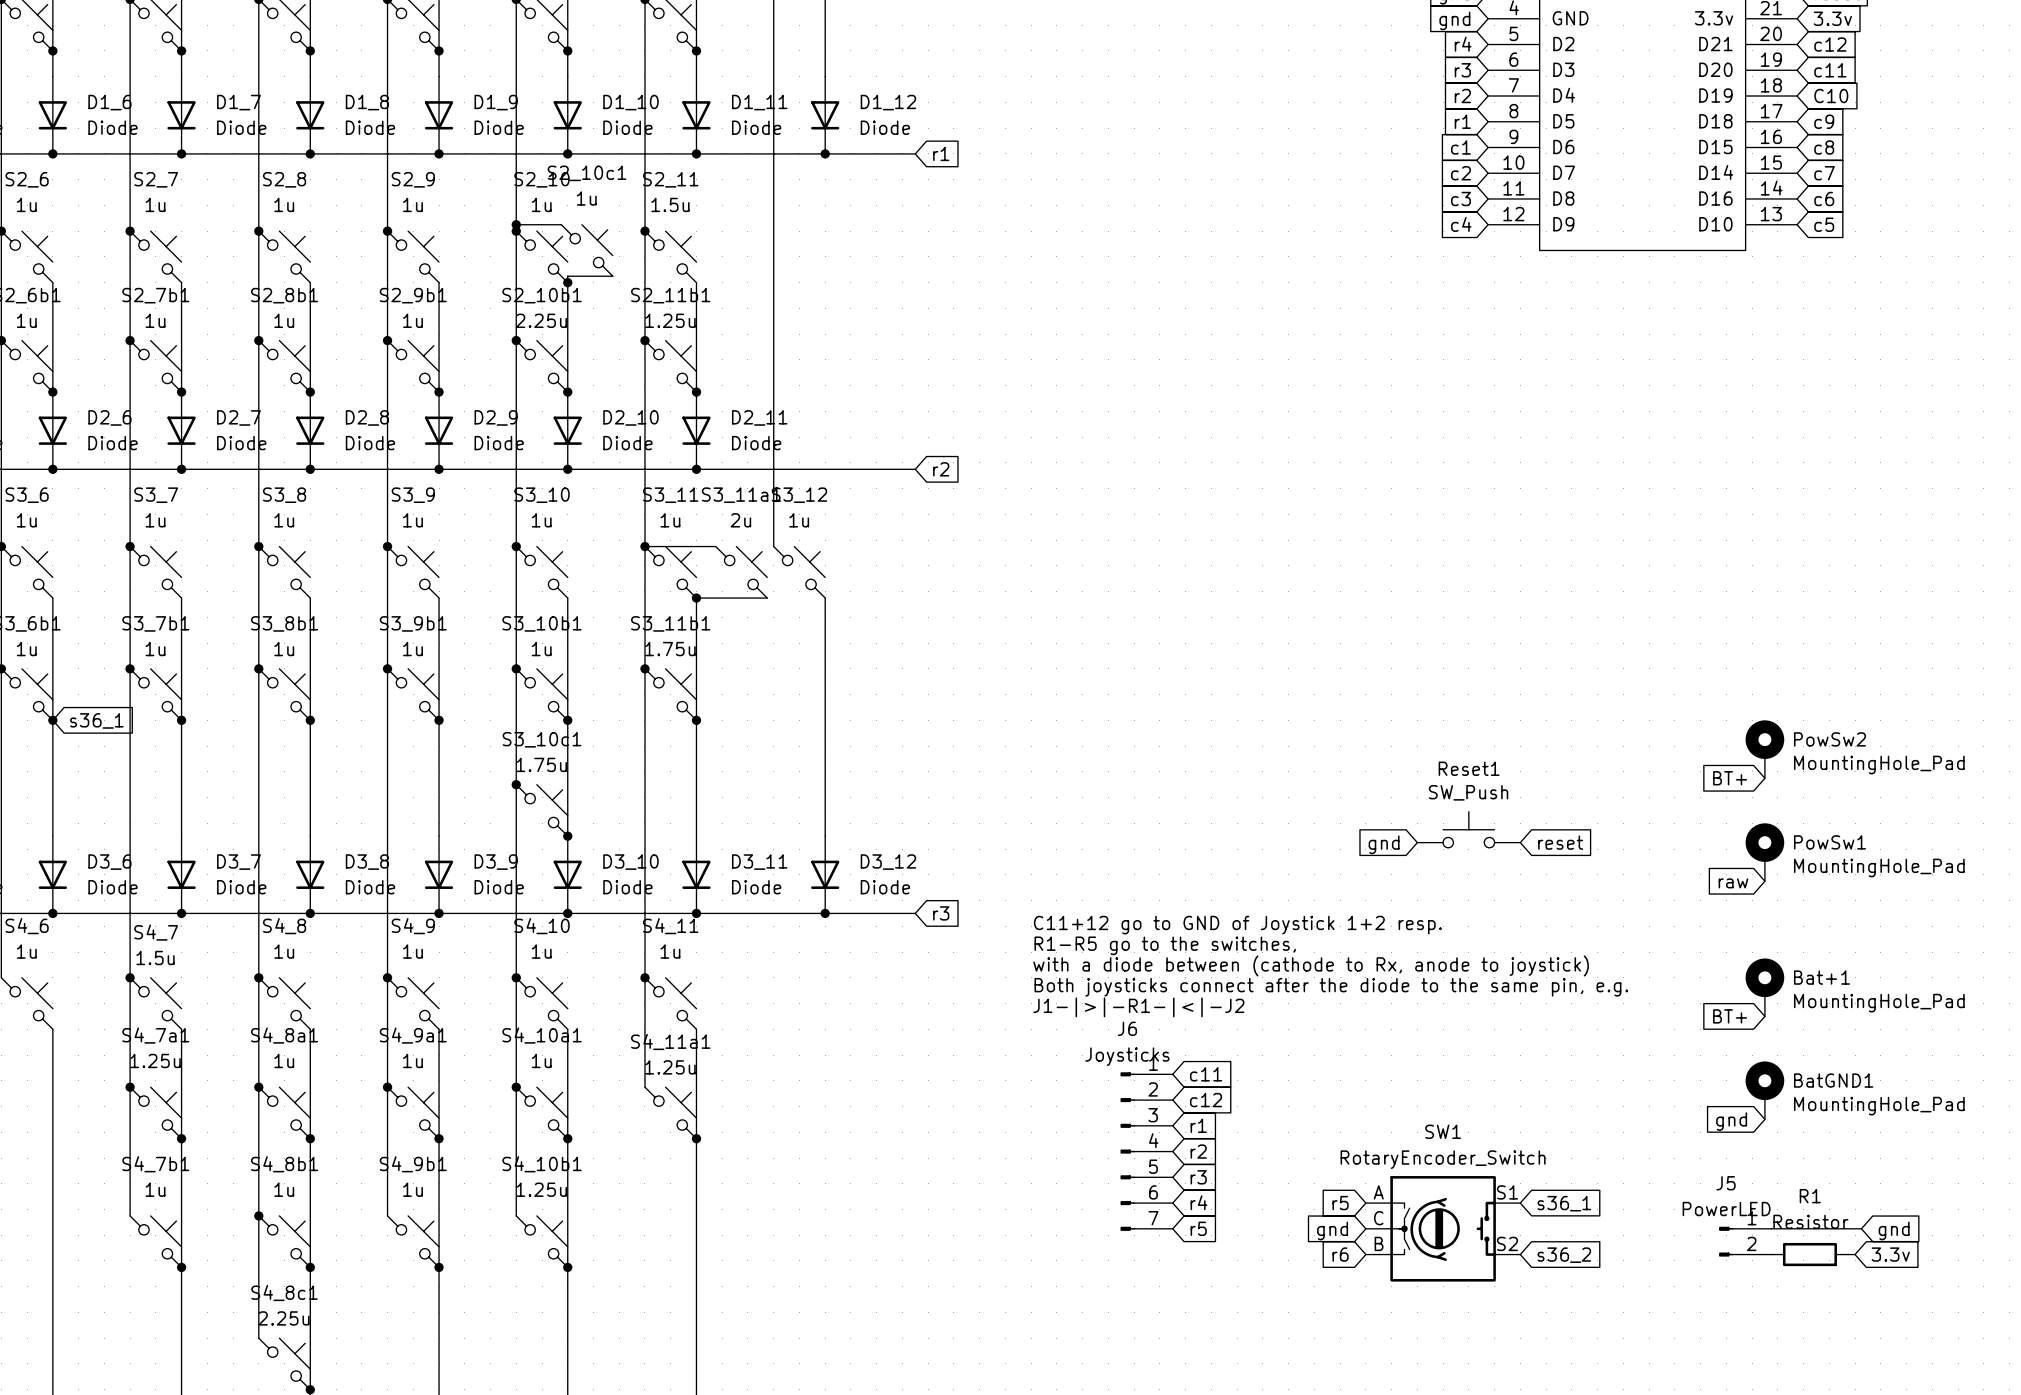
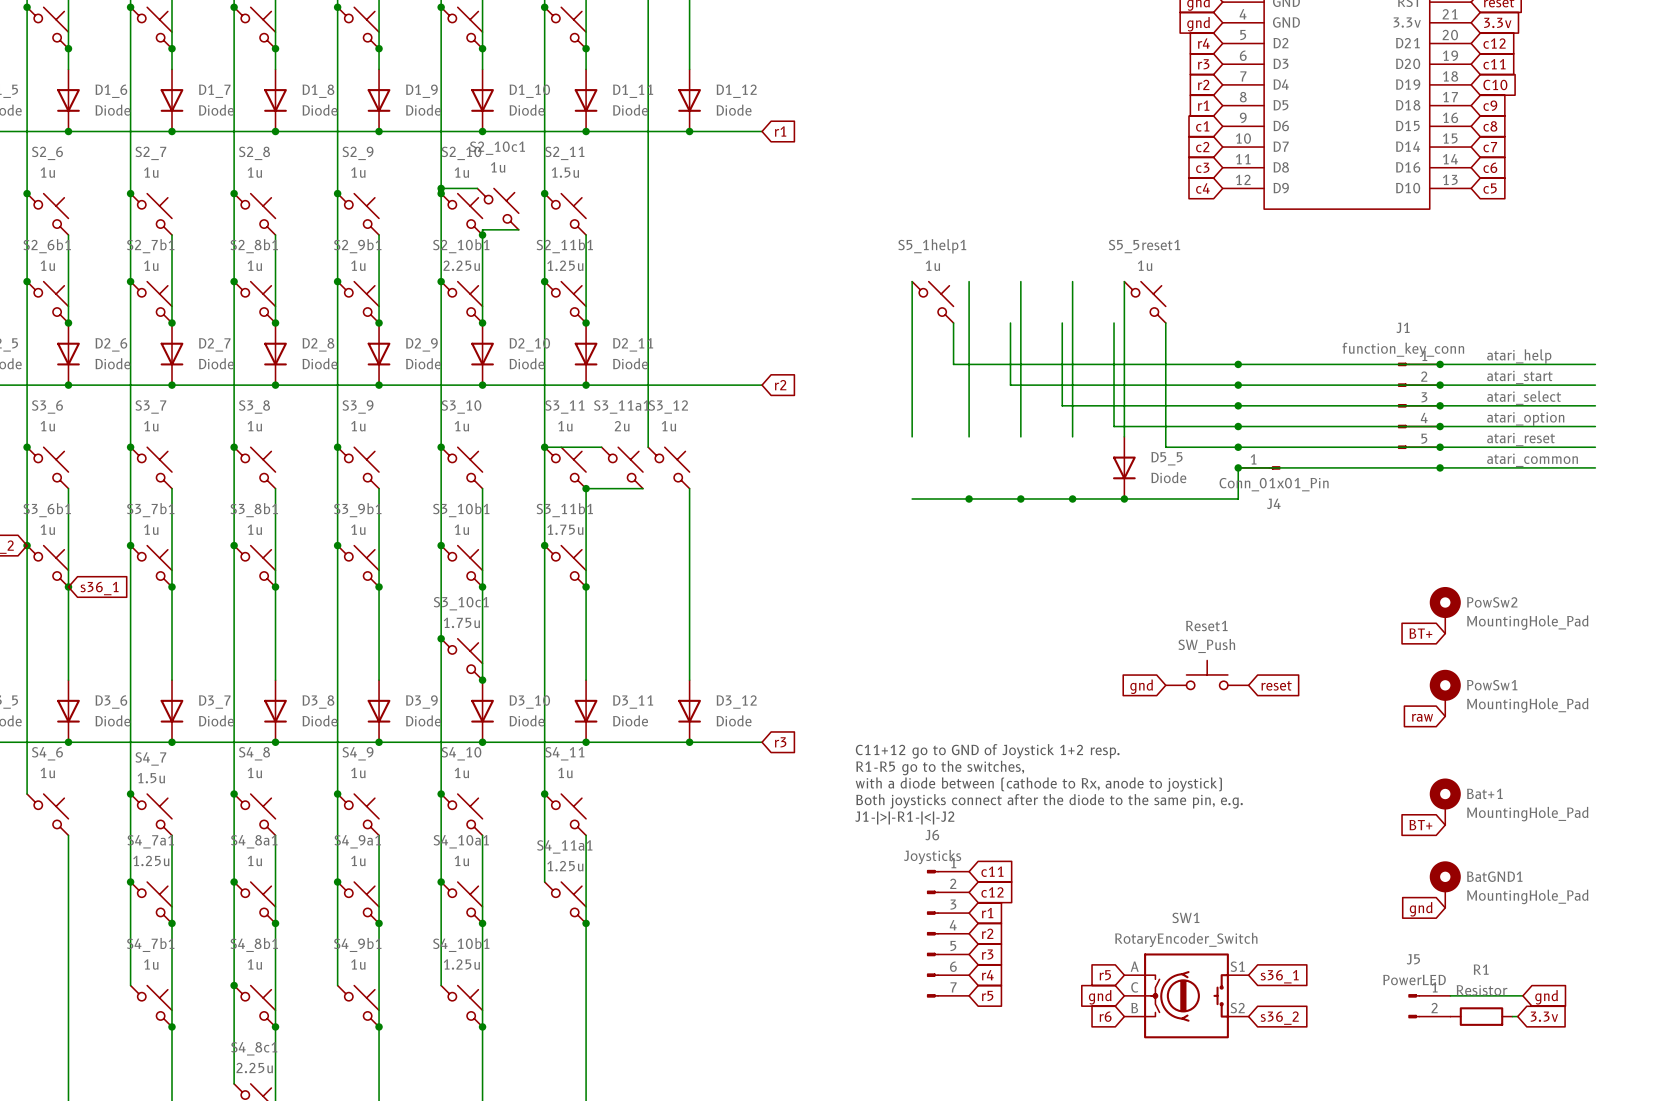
wire: none -> (912, 281) (912, 436)
wire: none -> (969, 281) (969, 436)
wire: none -> (1020, 281) (1020, 436)
wire: none -> (1072, 281) (1072, 436)
wire: none -> (1124, 281) (1124, 436)
S5_1help1: none -> 1u (932, 302)
S5_5reset1: none -> 1u (1145, 302)
wire: none -> (953, 323) (953, 364) (1595, 364)
wire: none -> (1010, 323) (1010, 385) (1595, 385)
wire: none -> (1062, 323) (1062, 405) (1595, 405)
wire: none -> (1114, 323) (1114, 426) (1595, 426)
wire: none -> (1165, 323) (1165, 447) (1595, 447)
label: none -> atari_help (1519, 356)
junction: none -> (1238, 364)
junction: none -> (1440, 364)
label: none -> atari_start (1519, 377)
junction: none -> (1238, 385)
junction: none -> (1440, 385)
label: none -> atari_select (1524, 397)
junction: none -> (1238, 405)
J1: none -> function_key_conn (1419, 405)
junction: none -> (1440, 405)
label: none -> atari_option (1525, 419)
junction: none -> (1238, 426)
junction: none -> (1440, 426)
label: none -> atari_reset (1521, 439)
junction: none -> (1238, 447)
junction: none -> (1440, 447)
label: none -> atari_common (1532, 460)
D5_5: none -> Diode (1124, 467)
junction: none -> (1238, 467)
J4: none -> Conn_01x01_Pin (1259, 467)
junction: none -> (1440, 467)
wire: none -> (1595, 467) (1238, 467) (1238, 498) (912, 498)
junction: none -> (969, 498)
junction: none -> (1020, 498)
junction: none -> (1072, 498)
junction: none -> (1124, 498)

